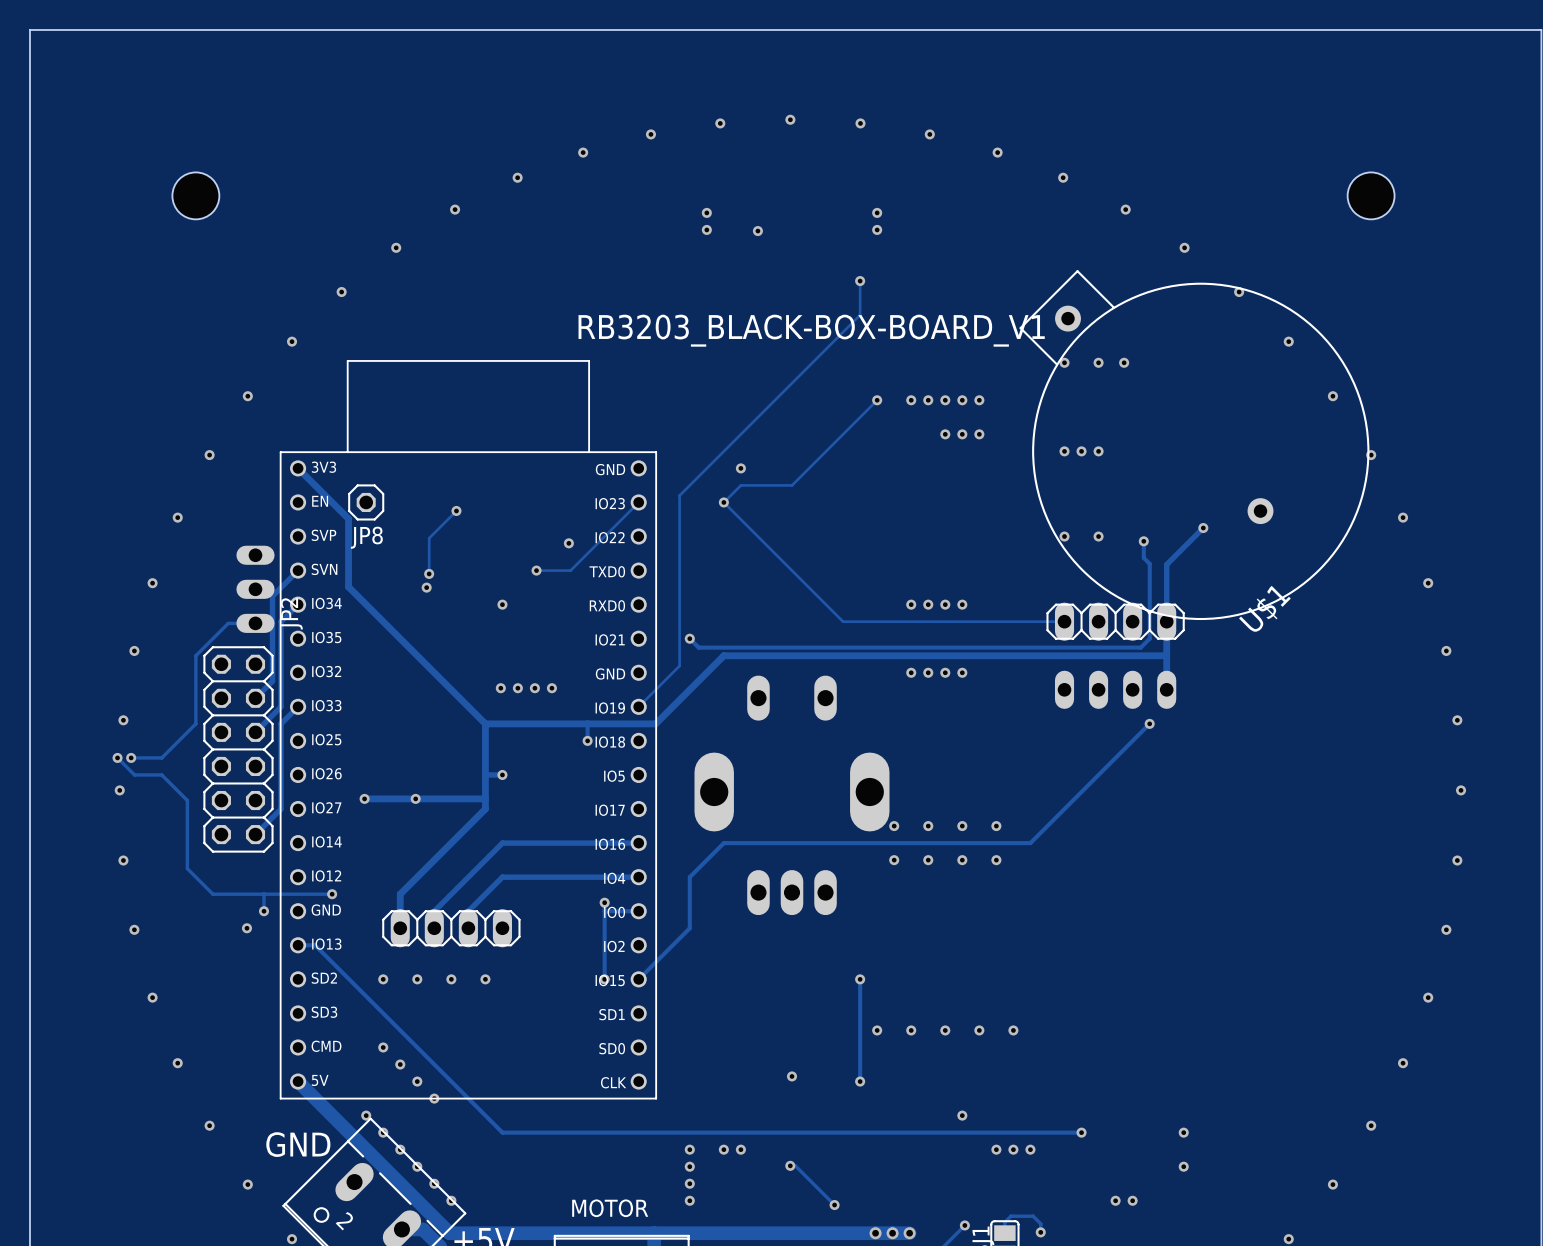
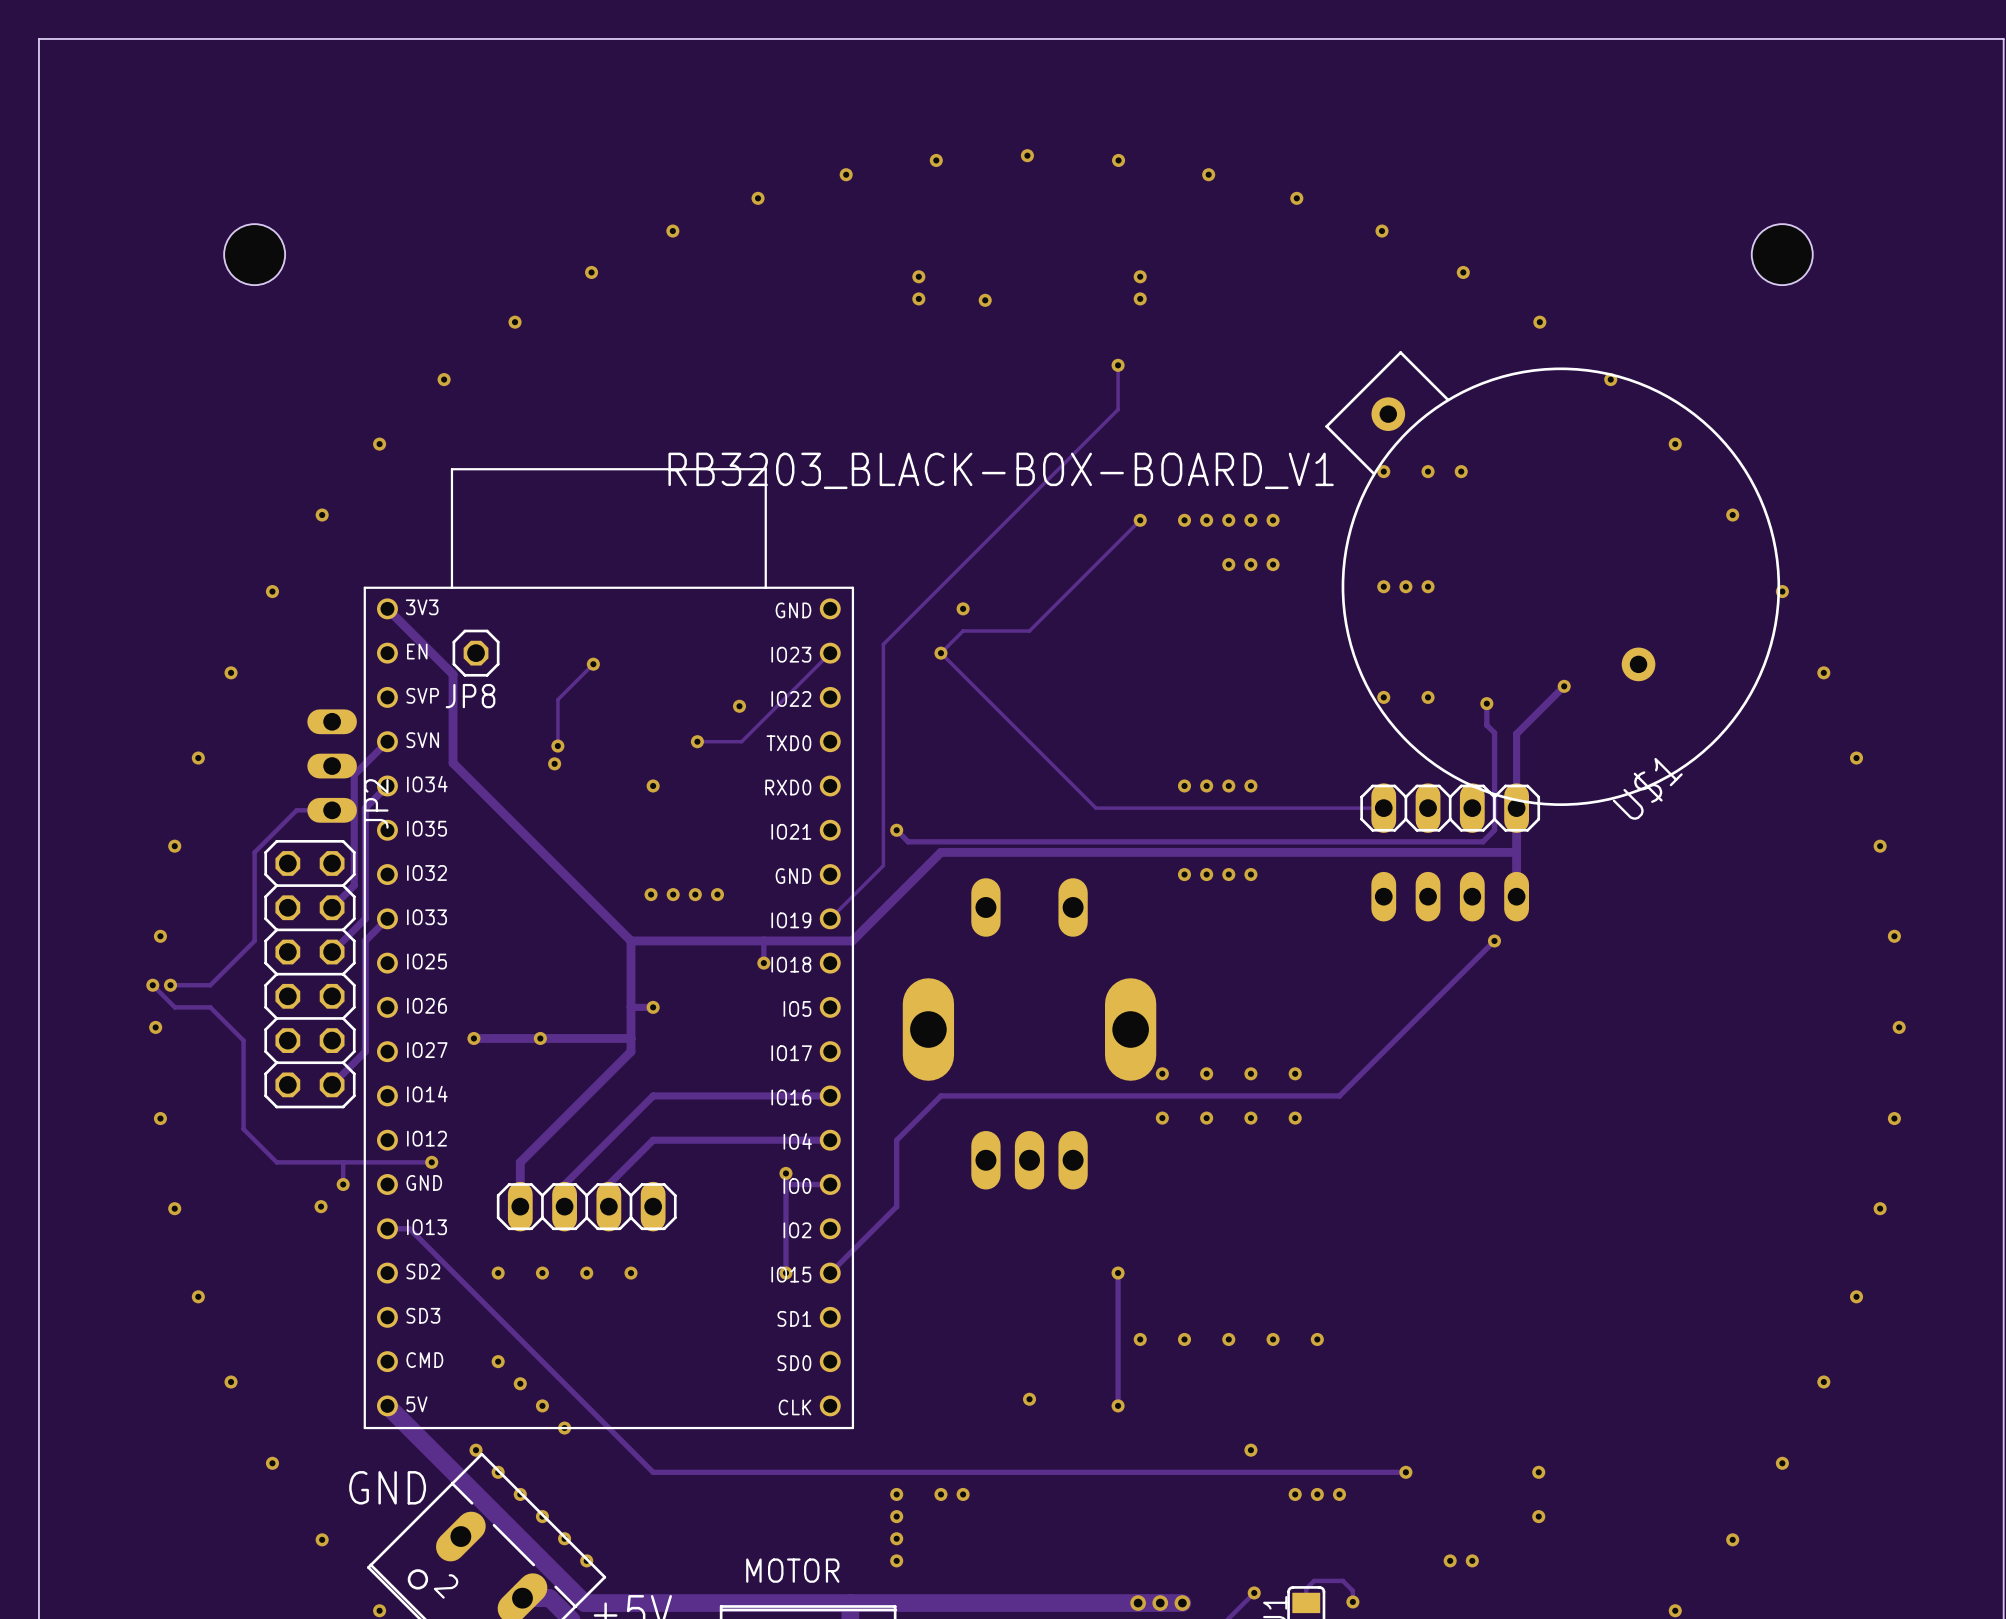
text position: RB3203_BLACK-BOX-BOARD_V1 (811, 330) -> RB3203_BLACK-BOX-BOARD_V1 (1001, 470)
track: (790, 1165) (795, 1165) (834, 1205) -> none
via: (790, 1165) -> none
via: (834, 1205) -> none

